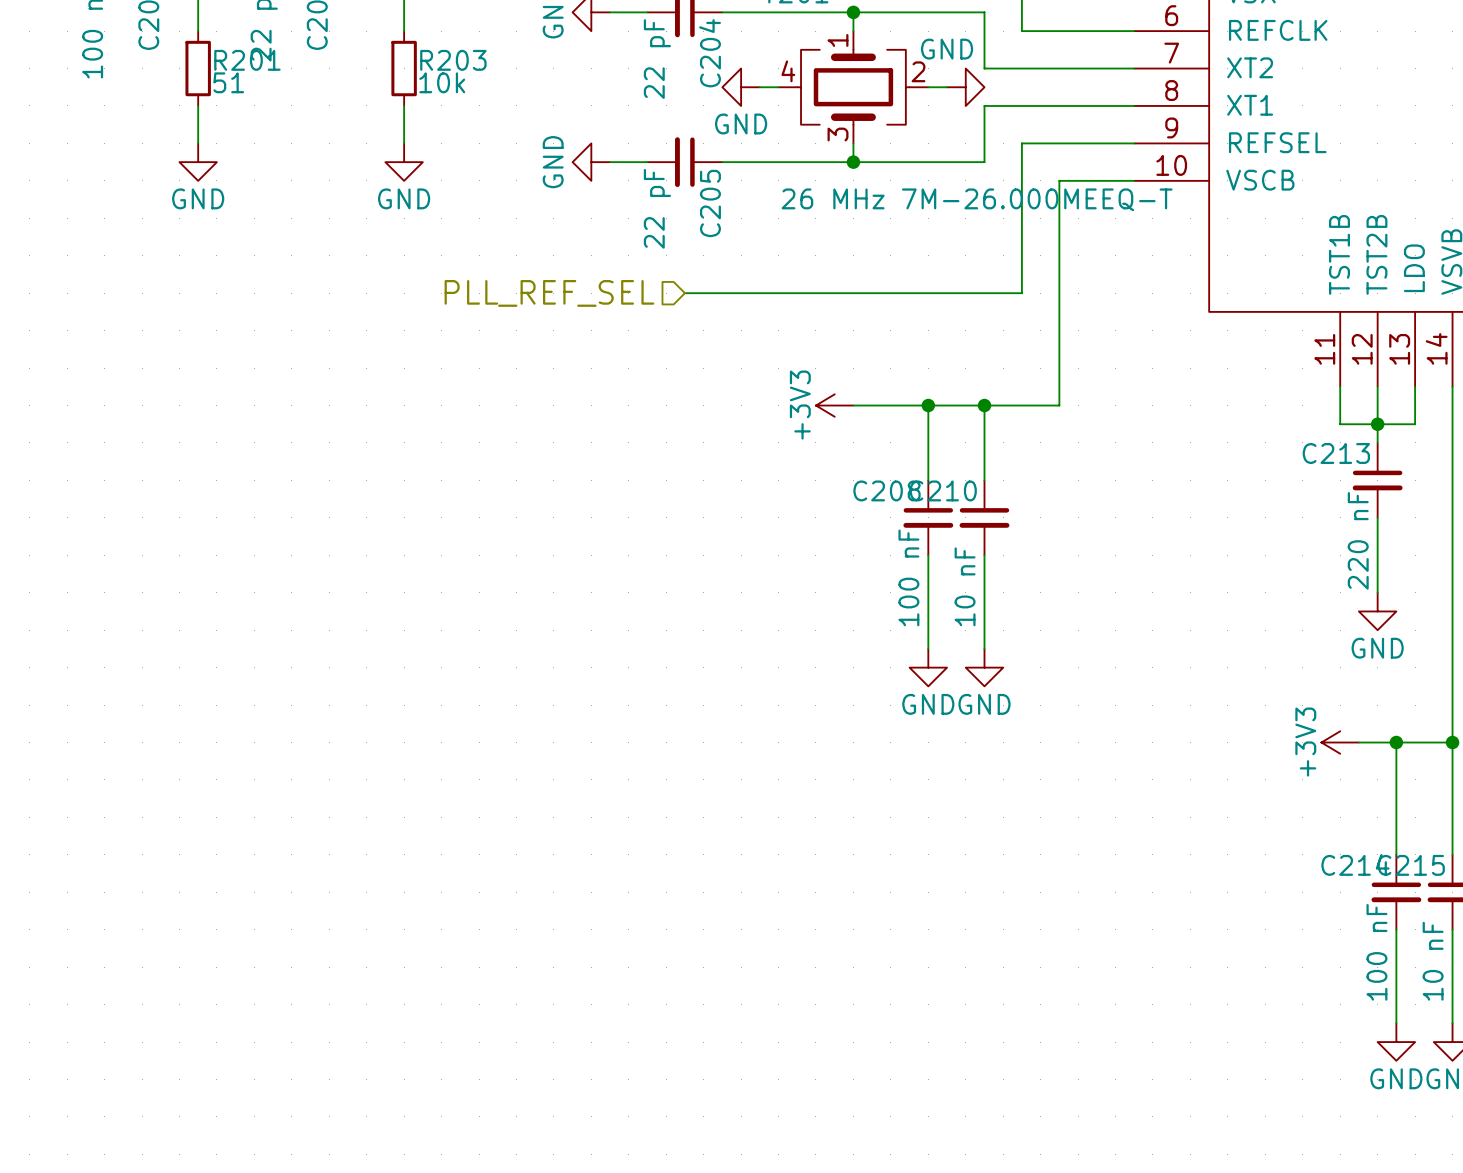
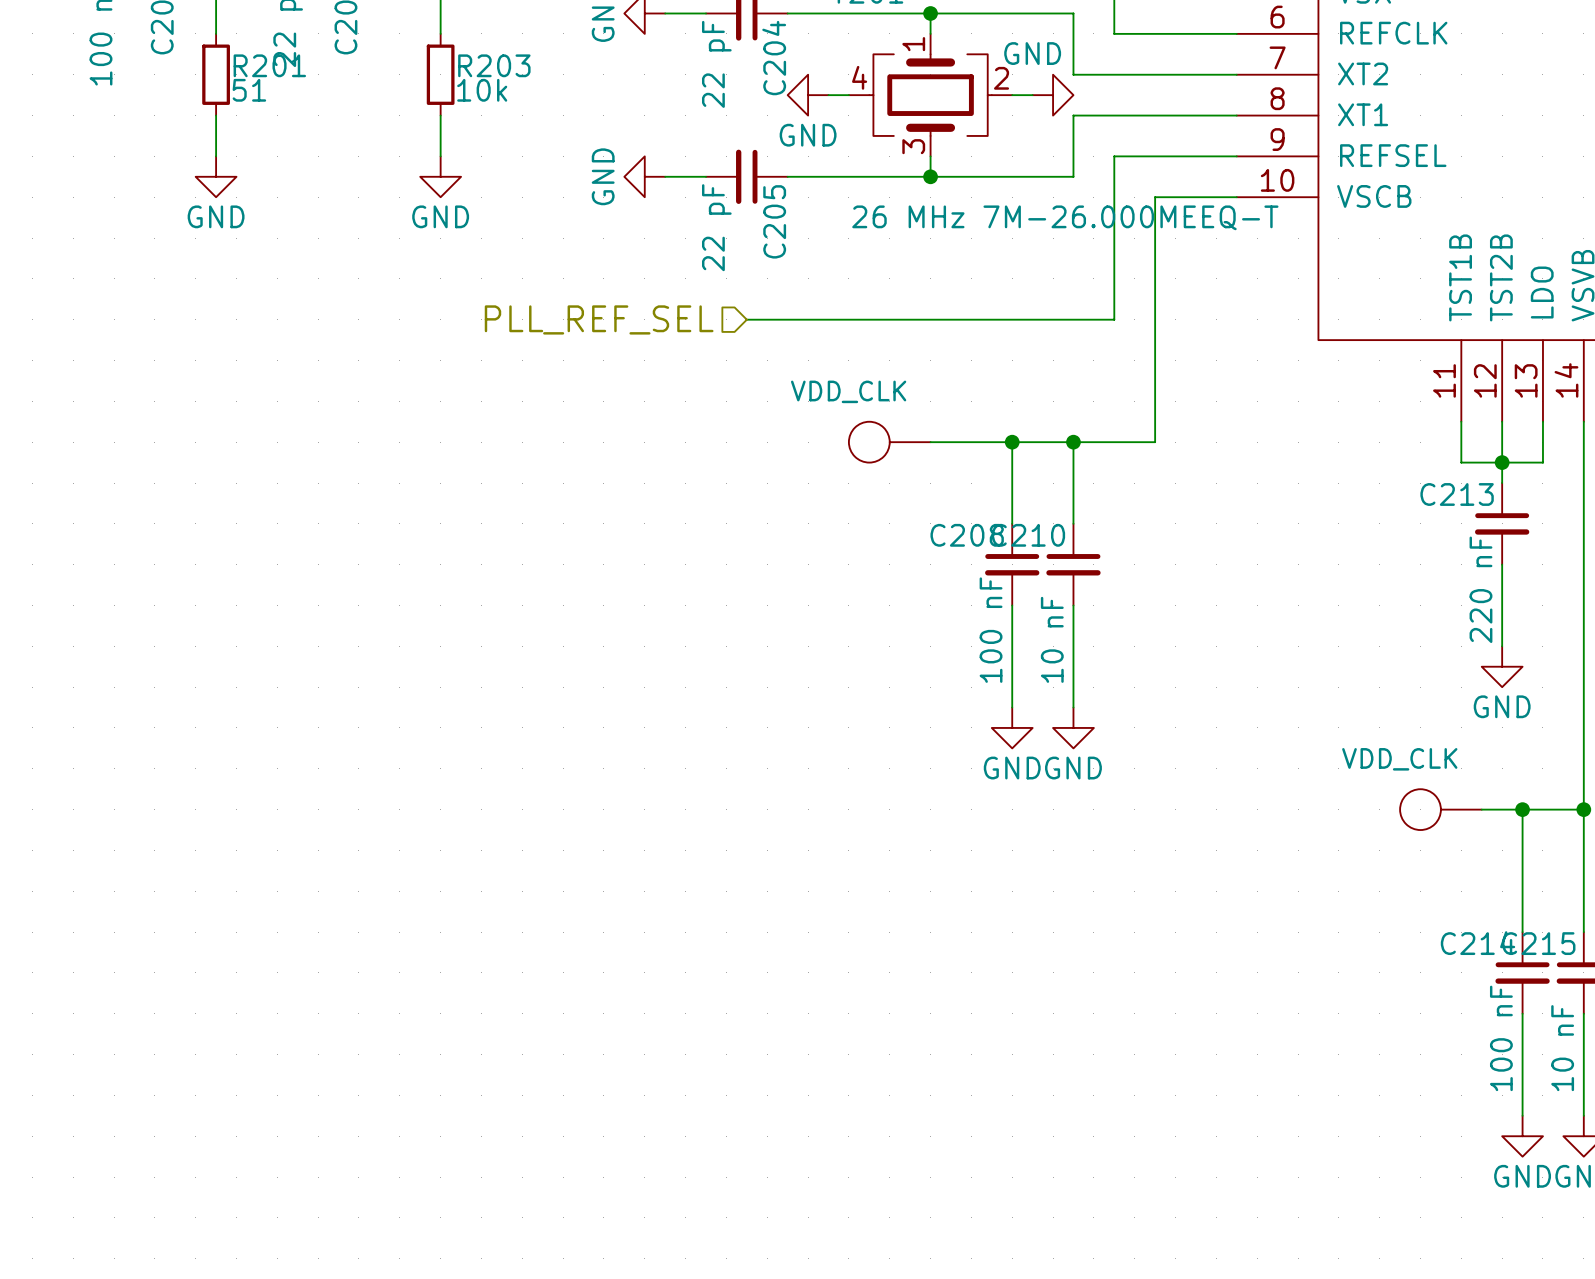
power symbol: none -> VDD_CLK (889, 442)
power symbol: +3V3 (834, 405) -> none
power symbol: none -> VDD_CLK (1440, 809)
power symbol: +3V3 (1340, 742) -> none

